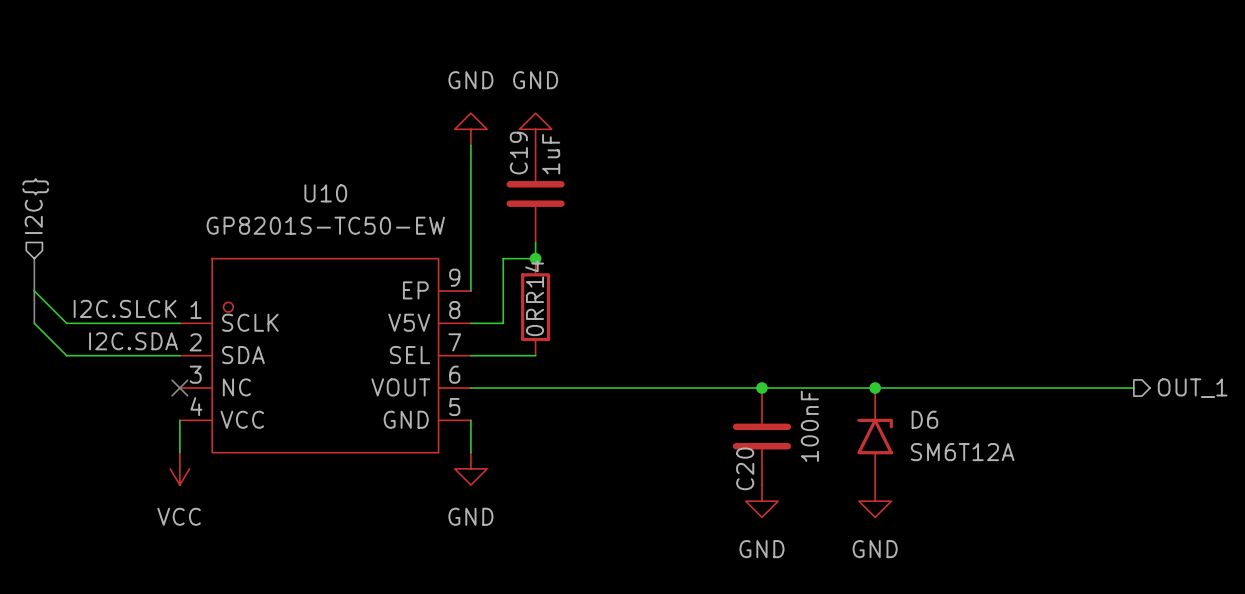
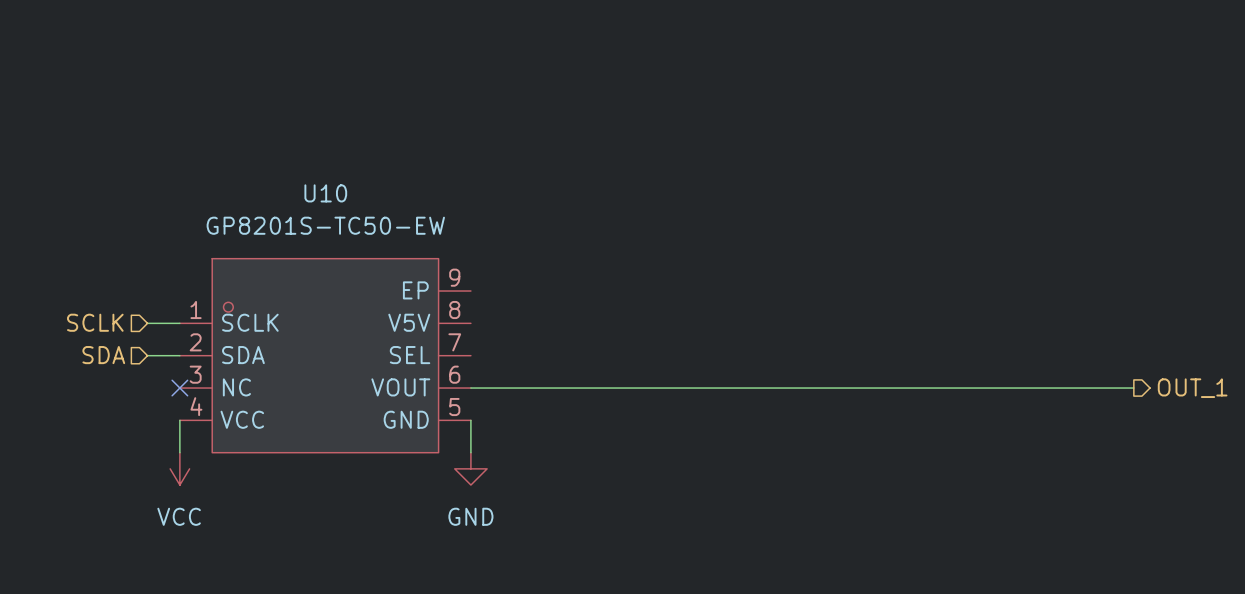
power symbol: GND (470, 129) -> none
power symbol: GND (535, 129) -> none
wire: (470, 145) (470, 291) -> none
C19: 1uF (535, 193) -> none
hierarchical label: I2C{} (35, 206) -> none
wire: (535, 242) (535, 258) (503, 258) (503, 323) (470, 323) -> none
bus: (34, 258) (34, 323) -> none
junction: (535, 258) -> none
wire: (34, 291) (66, 323) (147, 323) -> none
R14: 0R (535, 307) -> none
label: I2C.SLCK (125, 308) -> none
hierarchical label: none -> SCLK (95, 322)
wire: (34, 323) (66, 355) (147, 355) -> none
label: I2C.SDA (133, 341) -> none
hierarchical label: none -> SDA (103, 355)
wire: (470, 355) (535, 355) -> none
junction: (761, 388) -> none
junction: (875, 388) -> none
C20: 100nF (761, 436) -> none
D6: SM6T12A (875, 436) -> none
power symbol: GND (761, 501) -> none
power symbol: GND (875, 501) -> none

